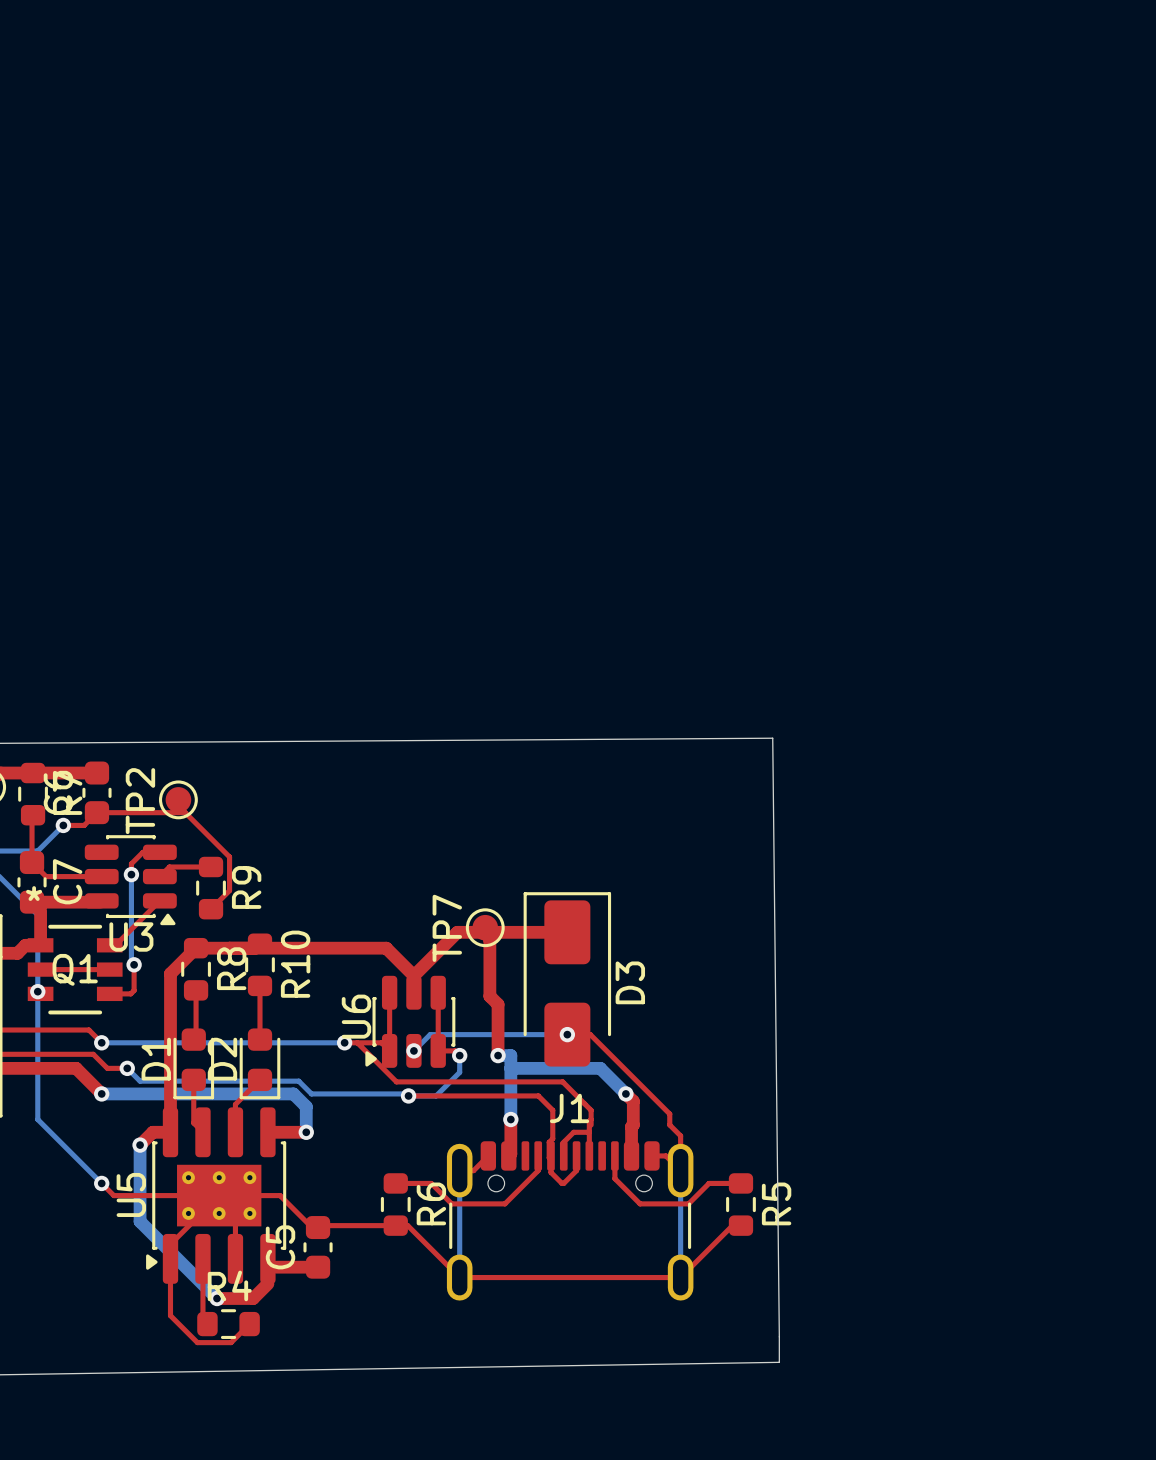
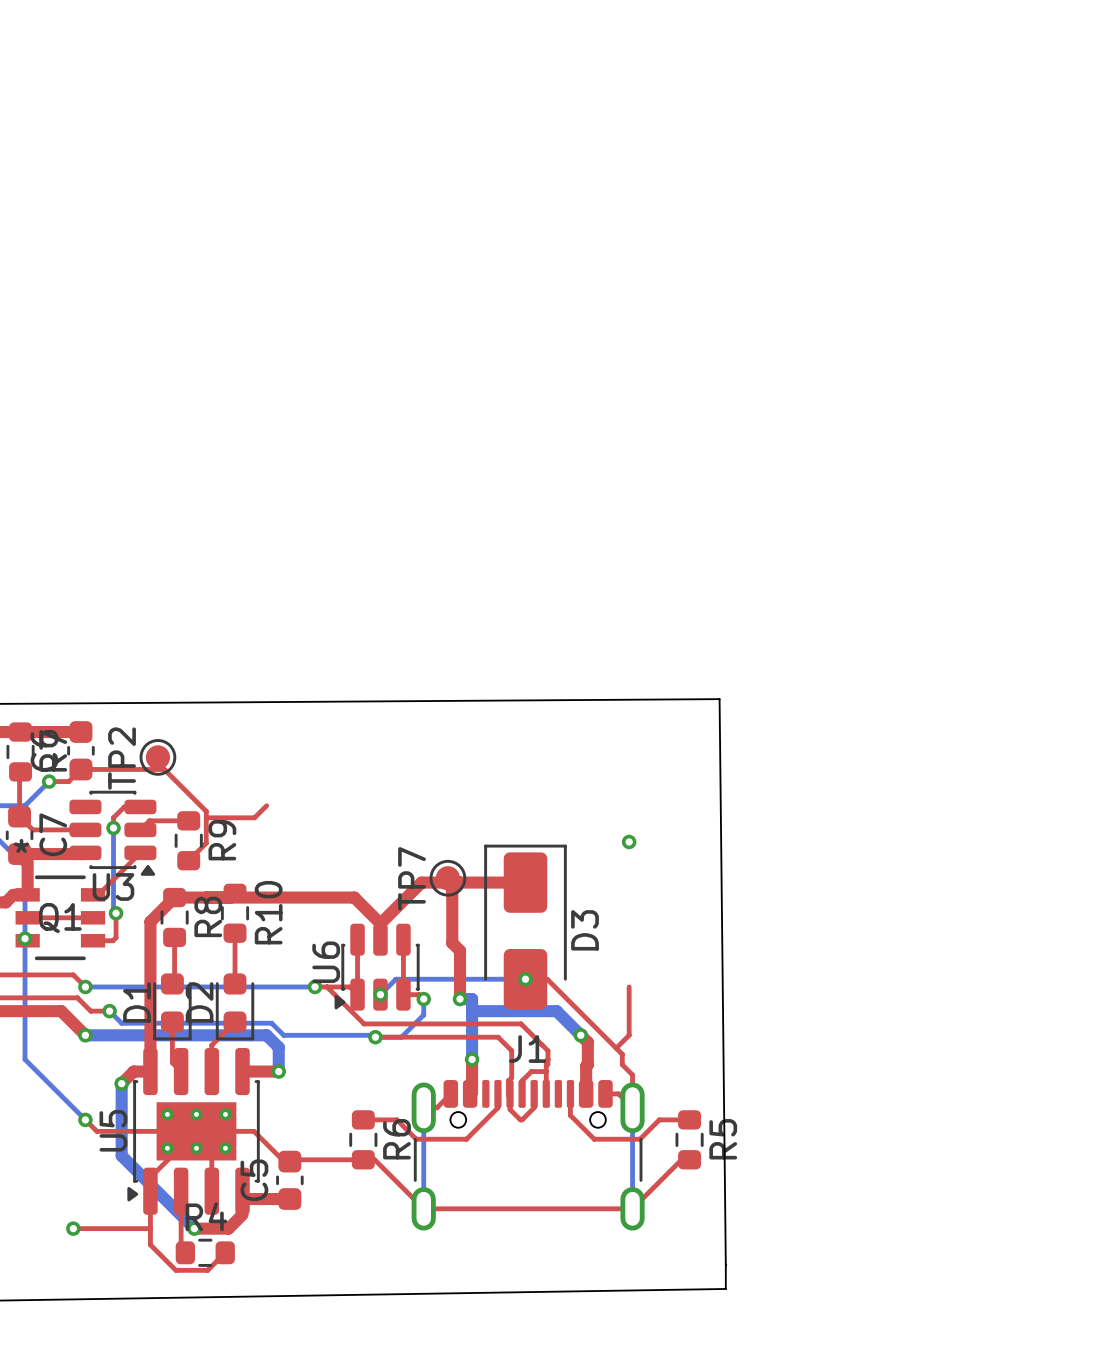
top track: none -> (266, 805) (254, 817) (206, 817)
via: none -> (629, 841)
top track: none -> (629, 986) (629, 1035) (616, 1048)
top track: none -> (73, 1228) (150, 1228)
via: none -> (73, 1228)

